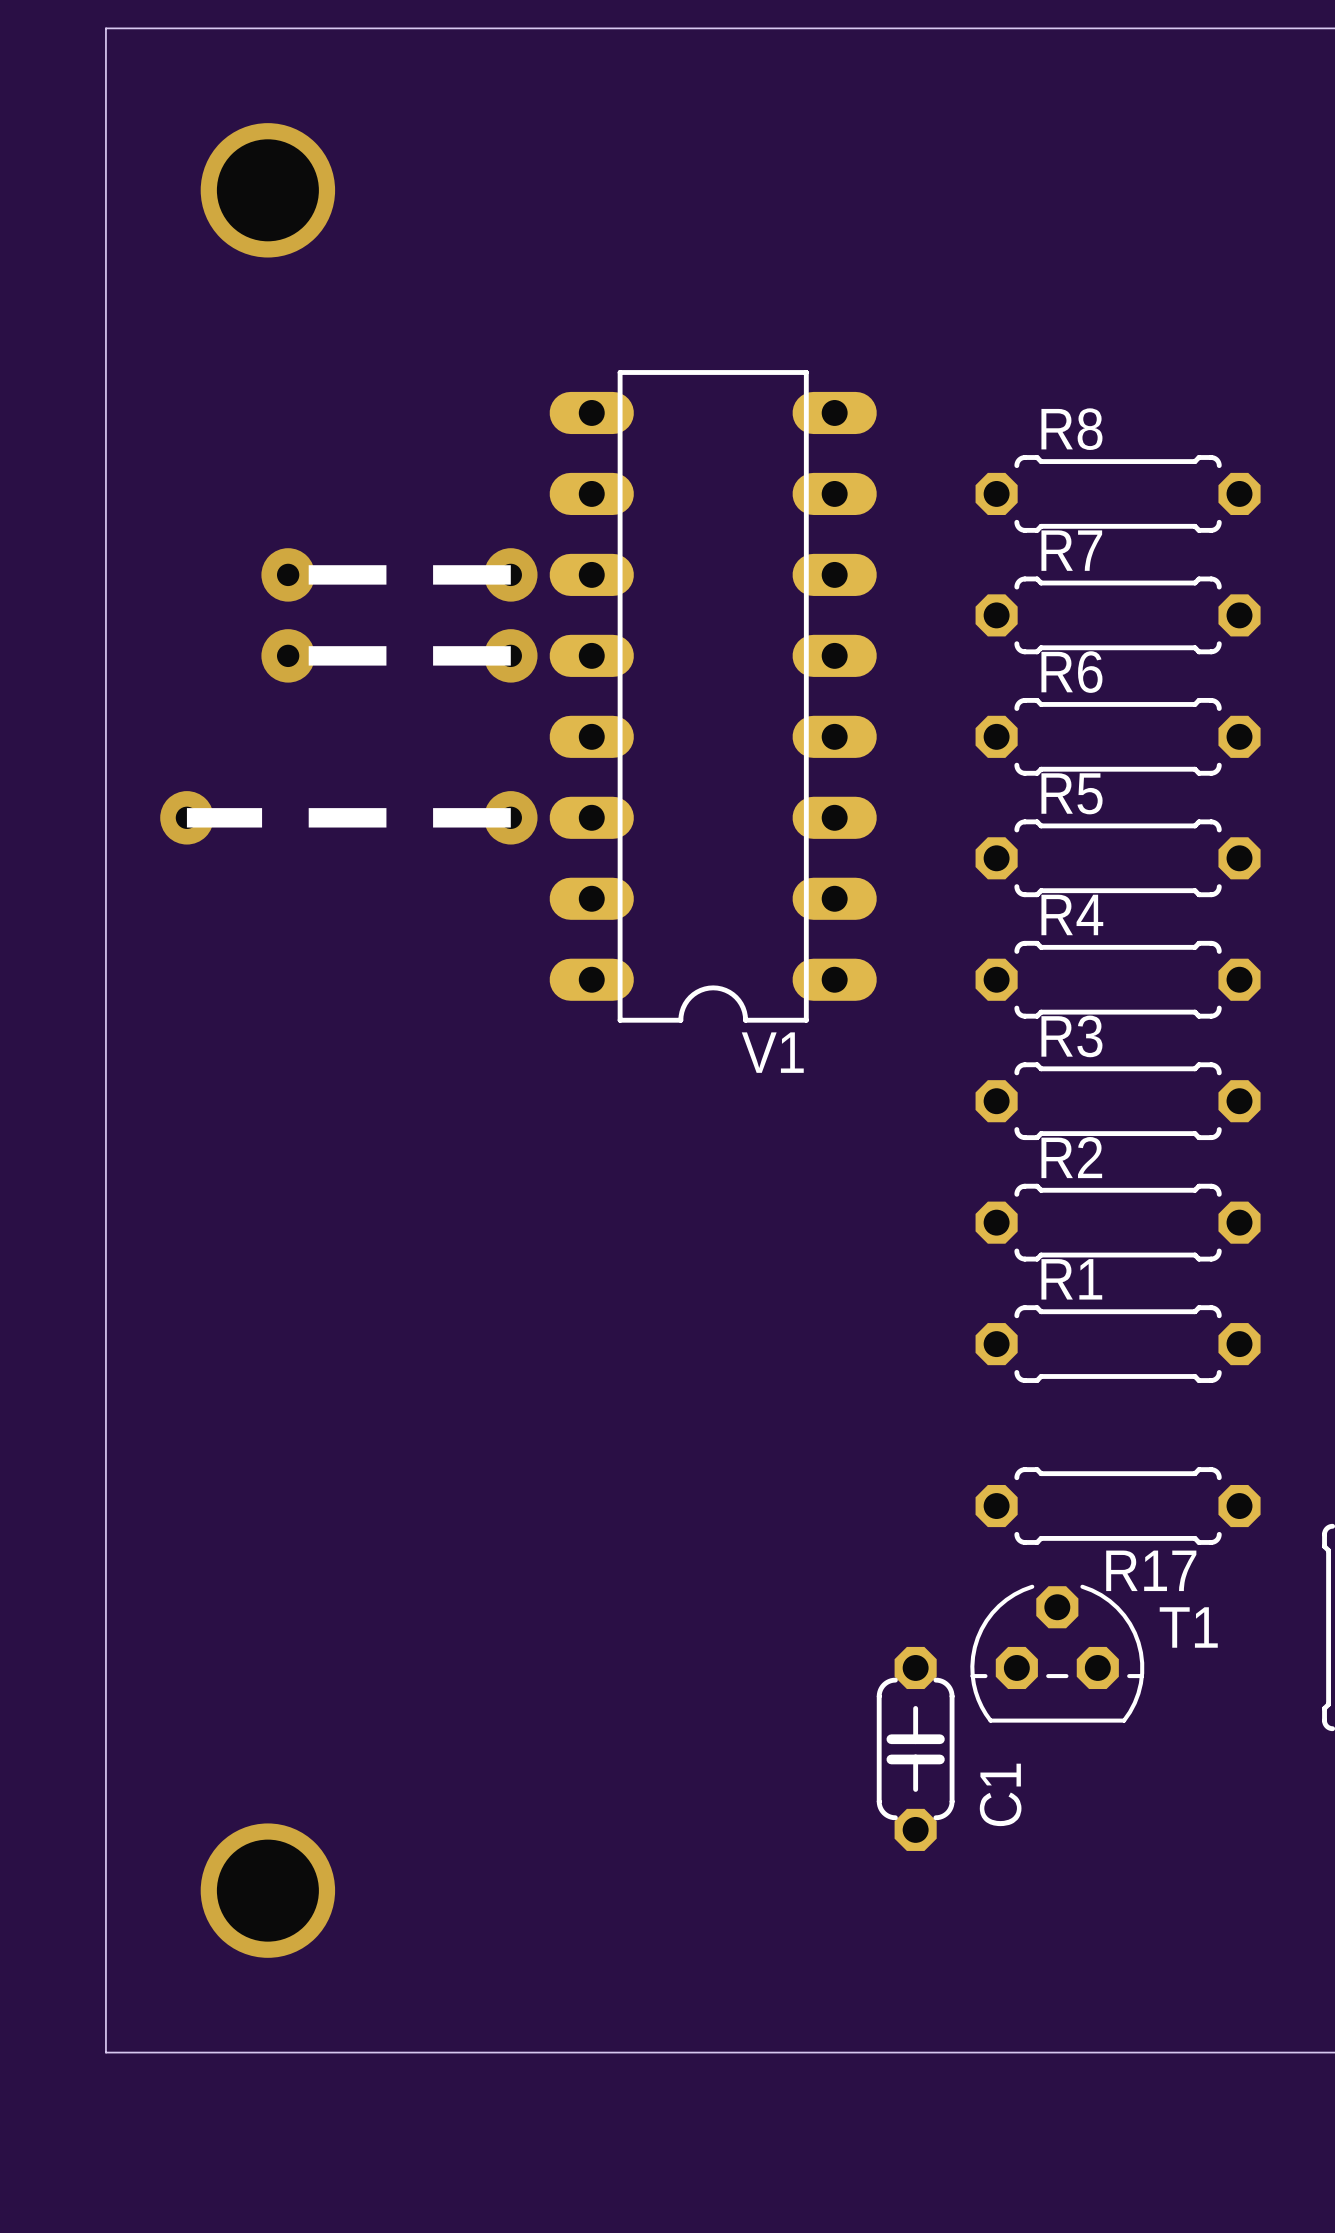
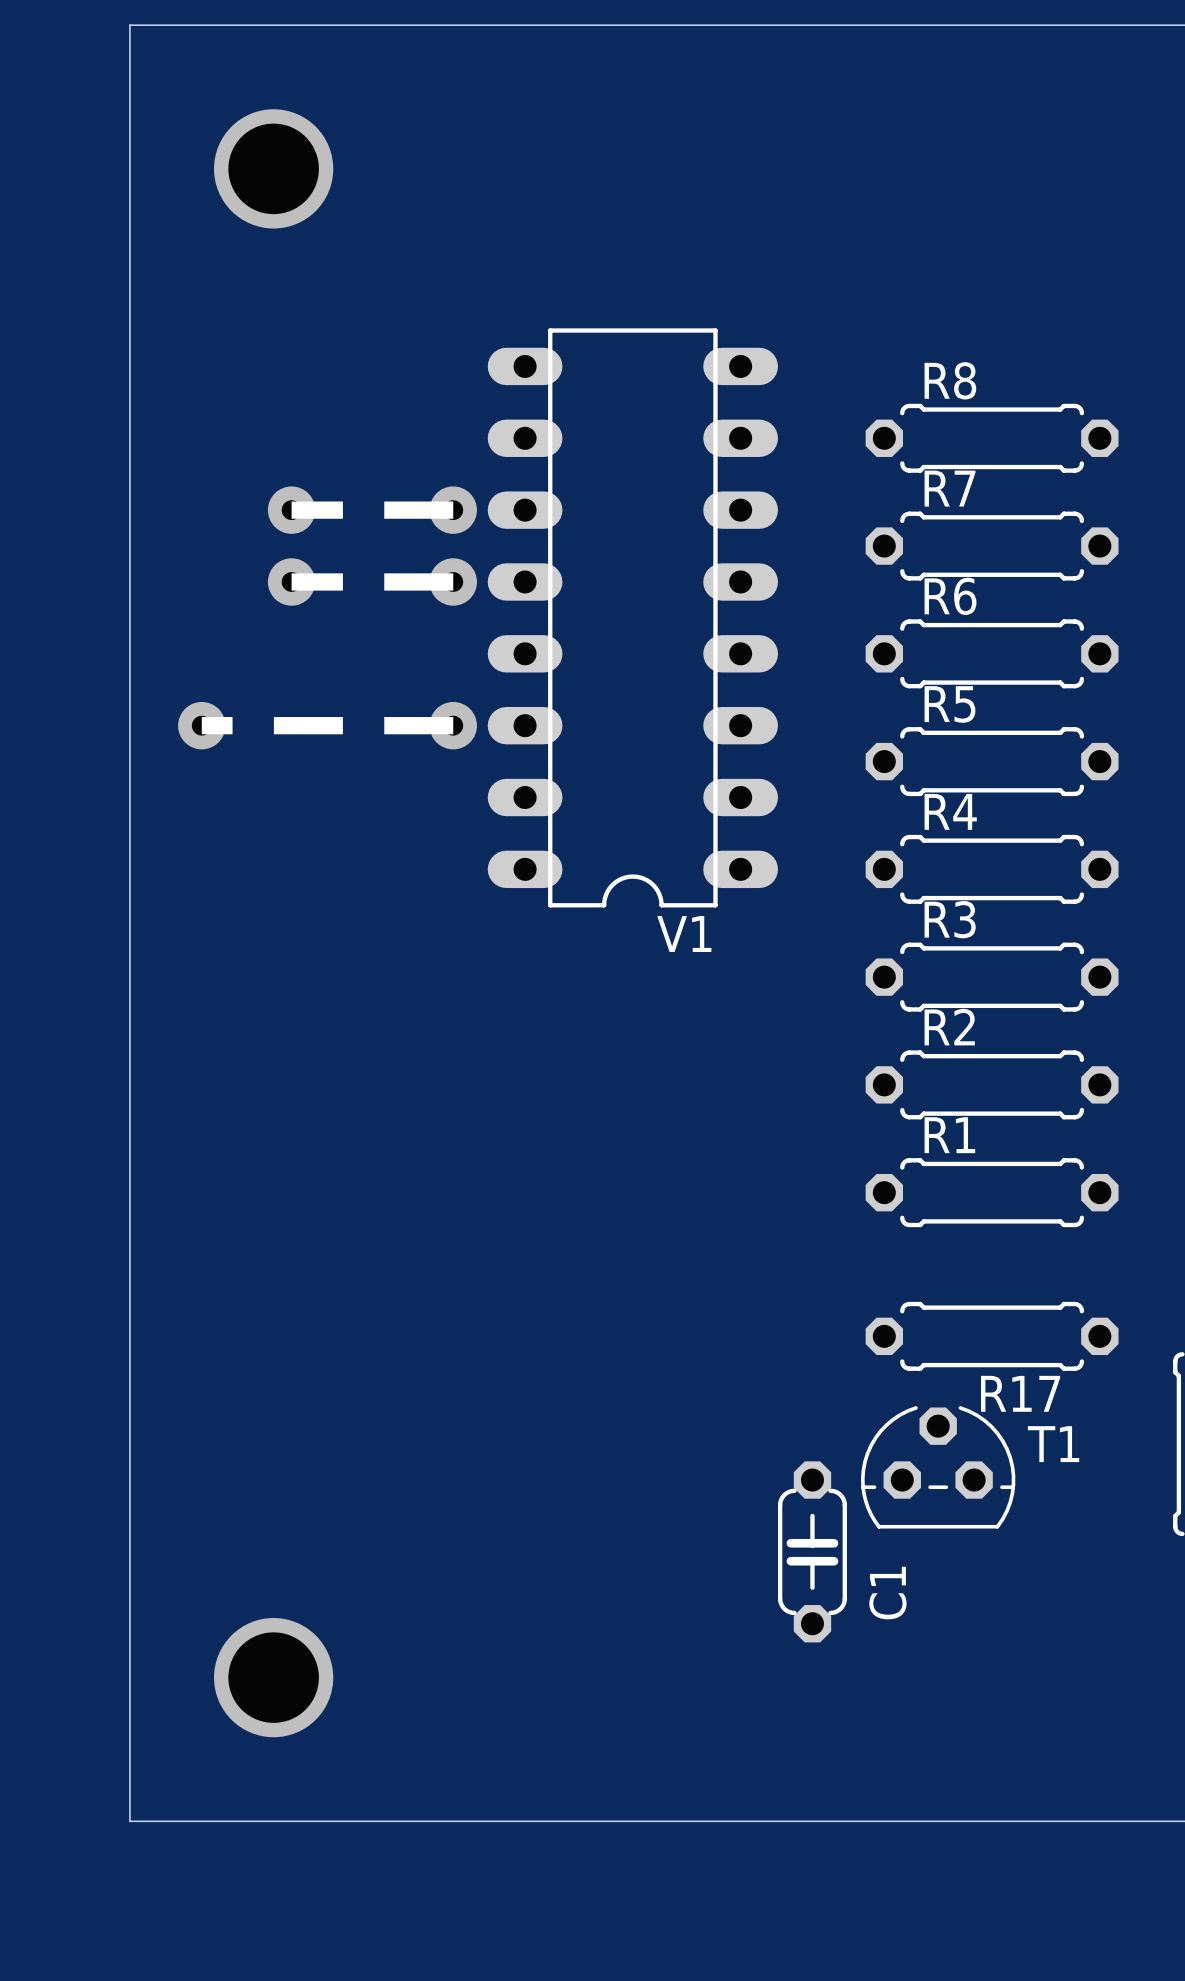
board edge: (146, 28) (105, 28) (105, 2052) (146, 2052) -> (129, 25) (129, 1821)
via position: (267, 190) -> (273, 168)
line: (288, 574) (328, 574) -> none
via position: (288, 574) -> (291, 510)
line: (288, 655) (328, 655) -> none
via position: (288, 655) -> (291, 581)
line: (186, 817) (227, 817) -> none
via position: (186, 817) -> (201, 725)
via position: (267, 1890) -> (273, 1677)

